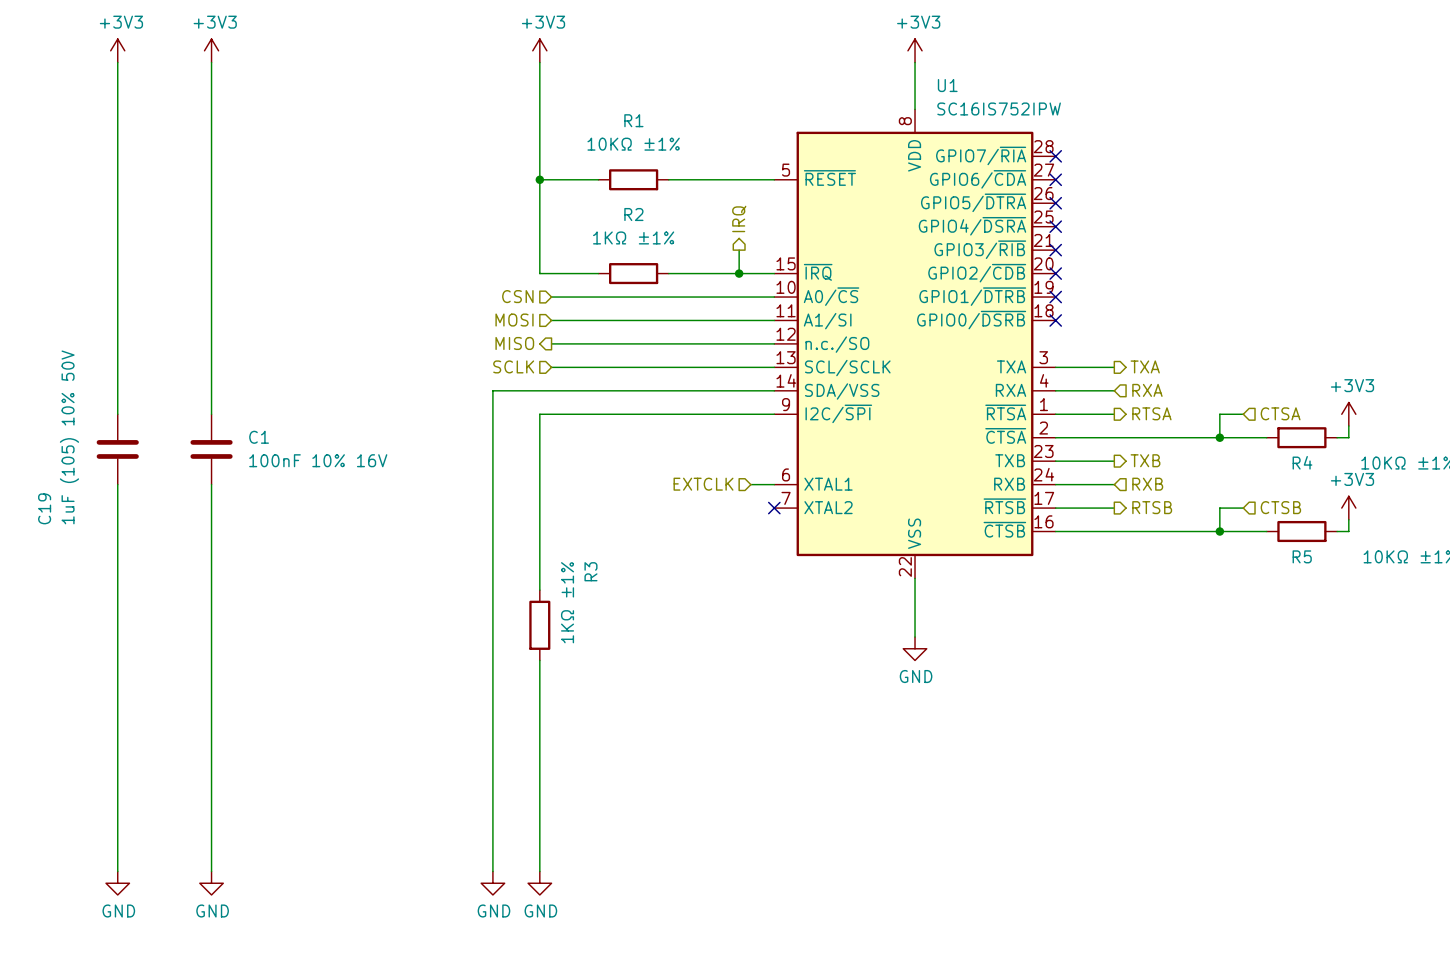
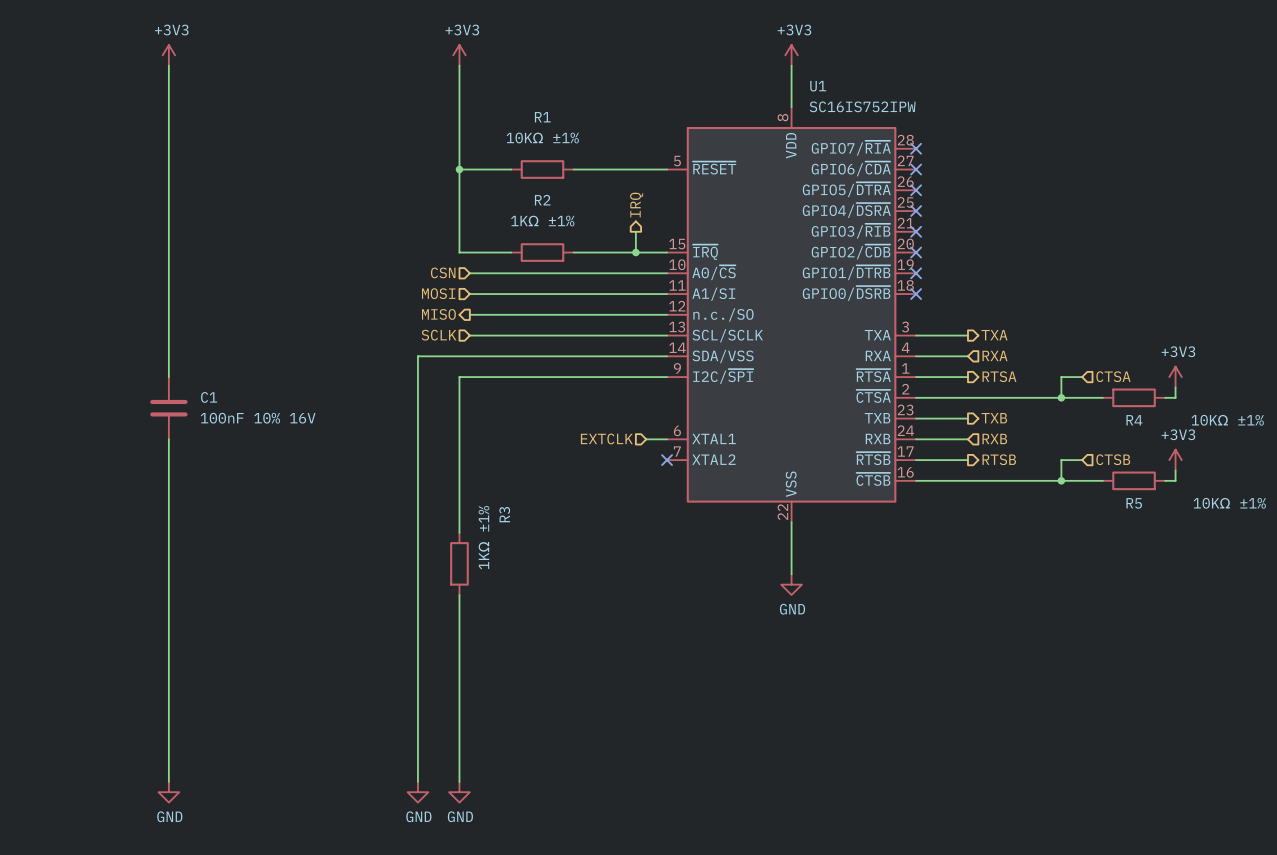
power symbol: +3V3 (117, 50) -> none
wire: (117, 62) (117, 414) -> none
C19: 1uF (105) 10% 50V (117, 449) -> none
wire: (117, 484) (117, 871) -> none
power symbol: GND (117, 883) -> none

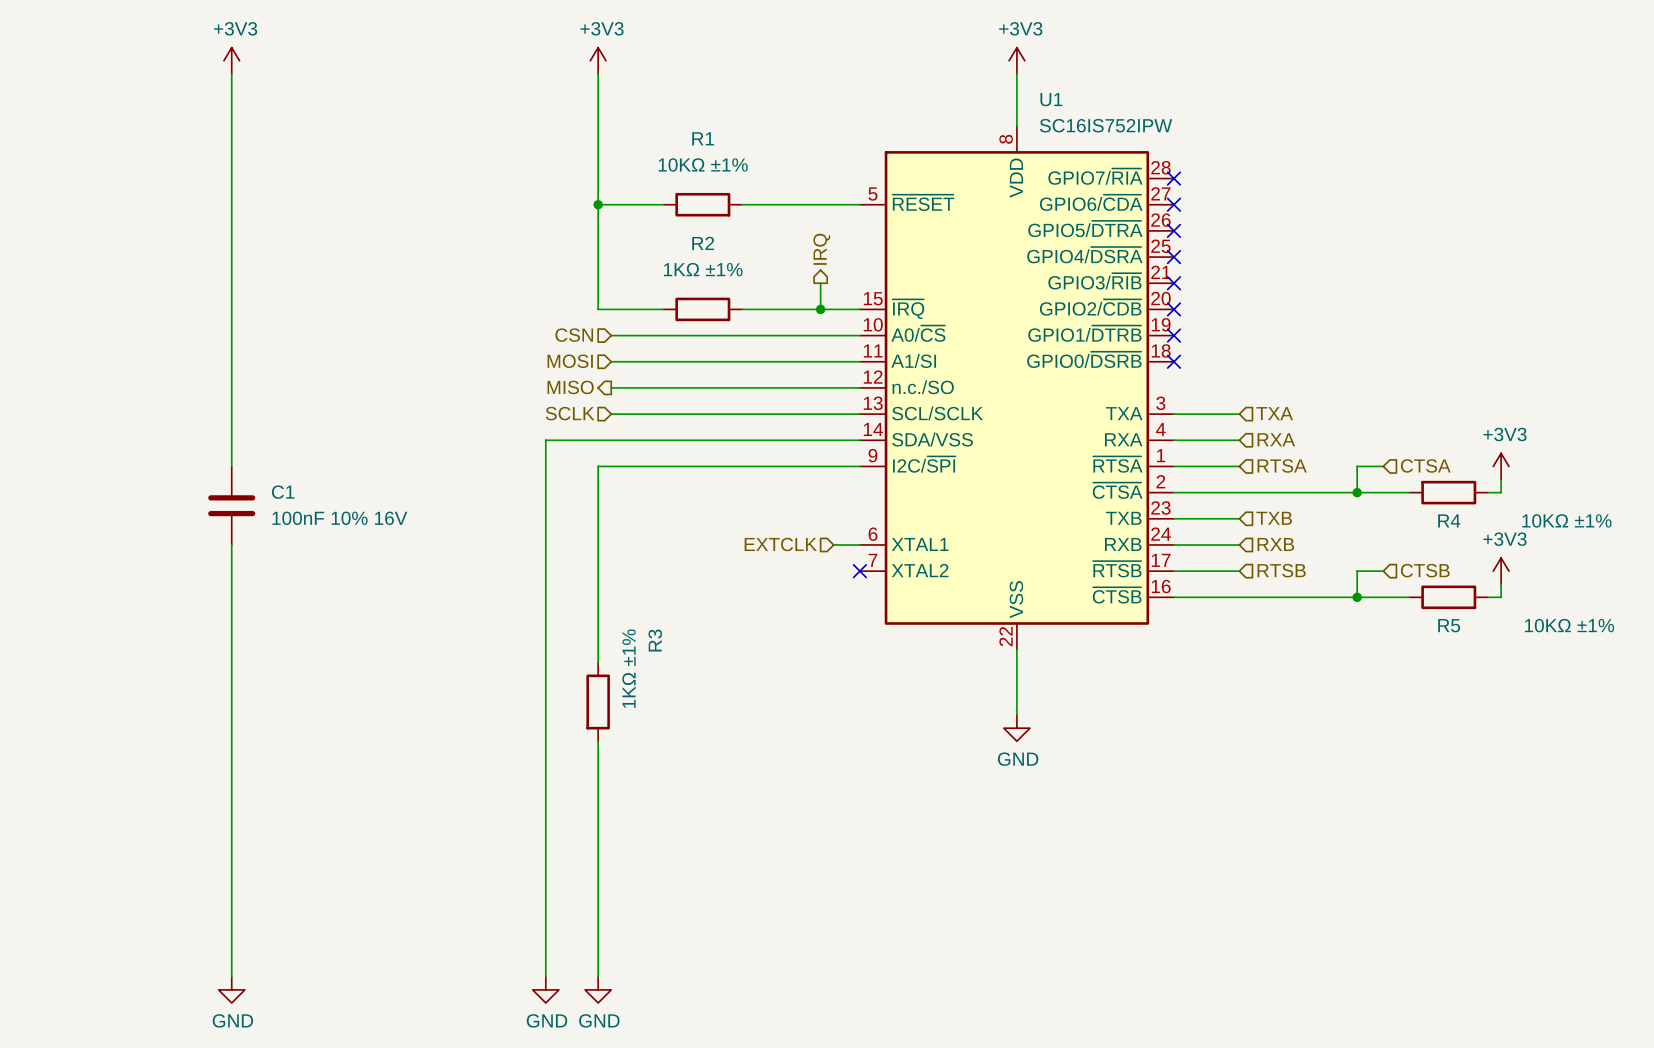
hierarchical label shape: output (994, 335) -> input (1274, 413)
hierarchical label shape: output (999, 376) -> input (1282, 465)
hierarchical label shape: output (994, 418) -> input (1274, 518)
hierarchical label shape: output (999, 459) -> input (1281, 570)

